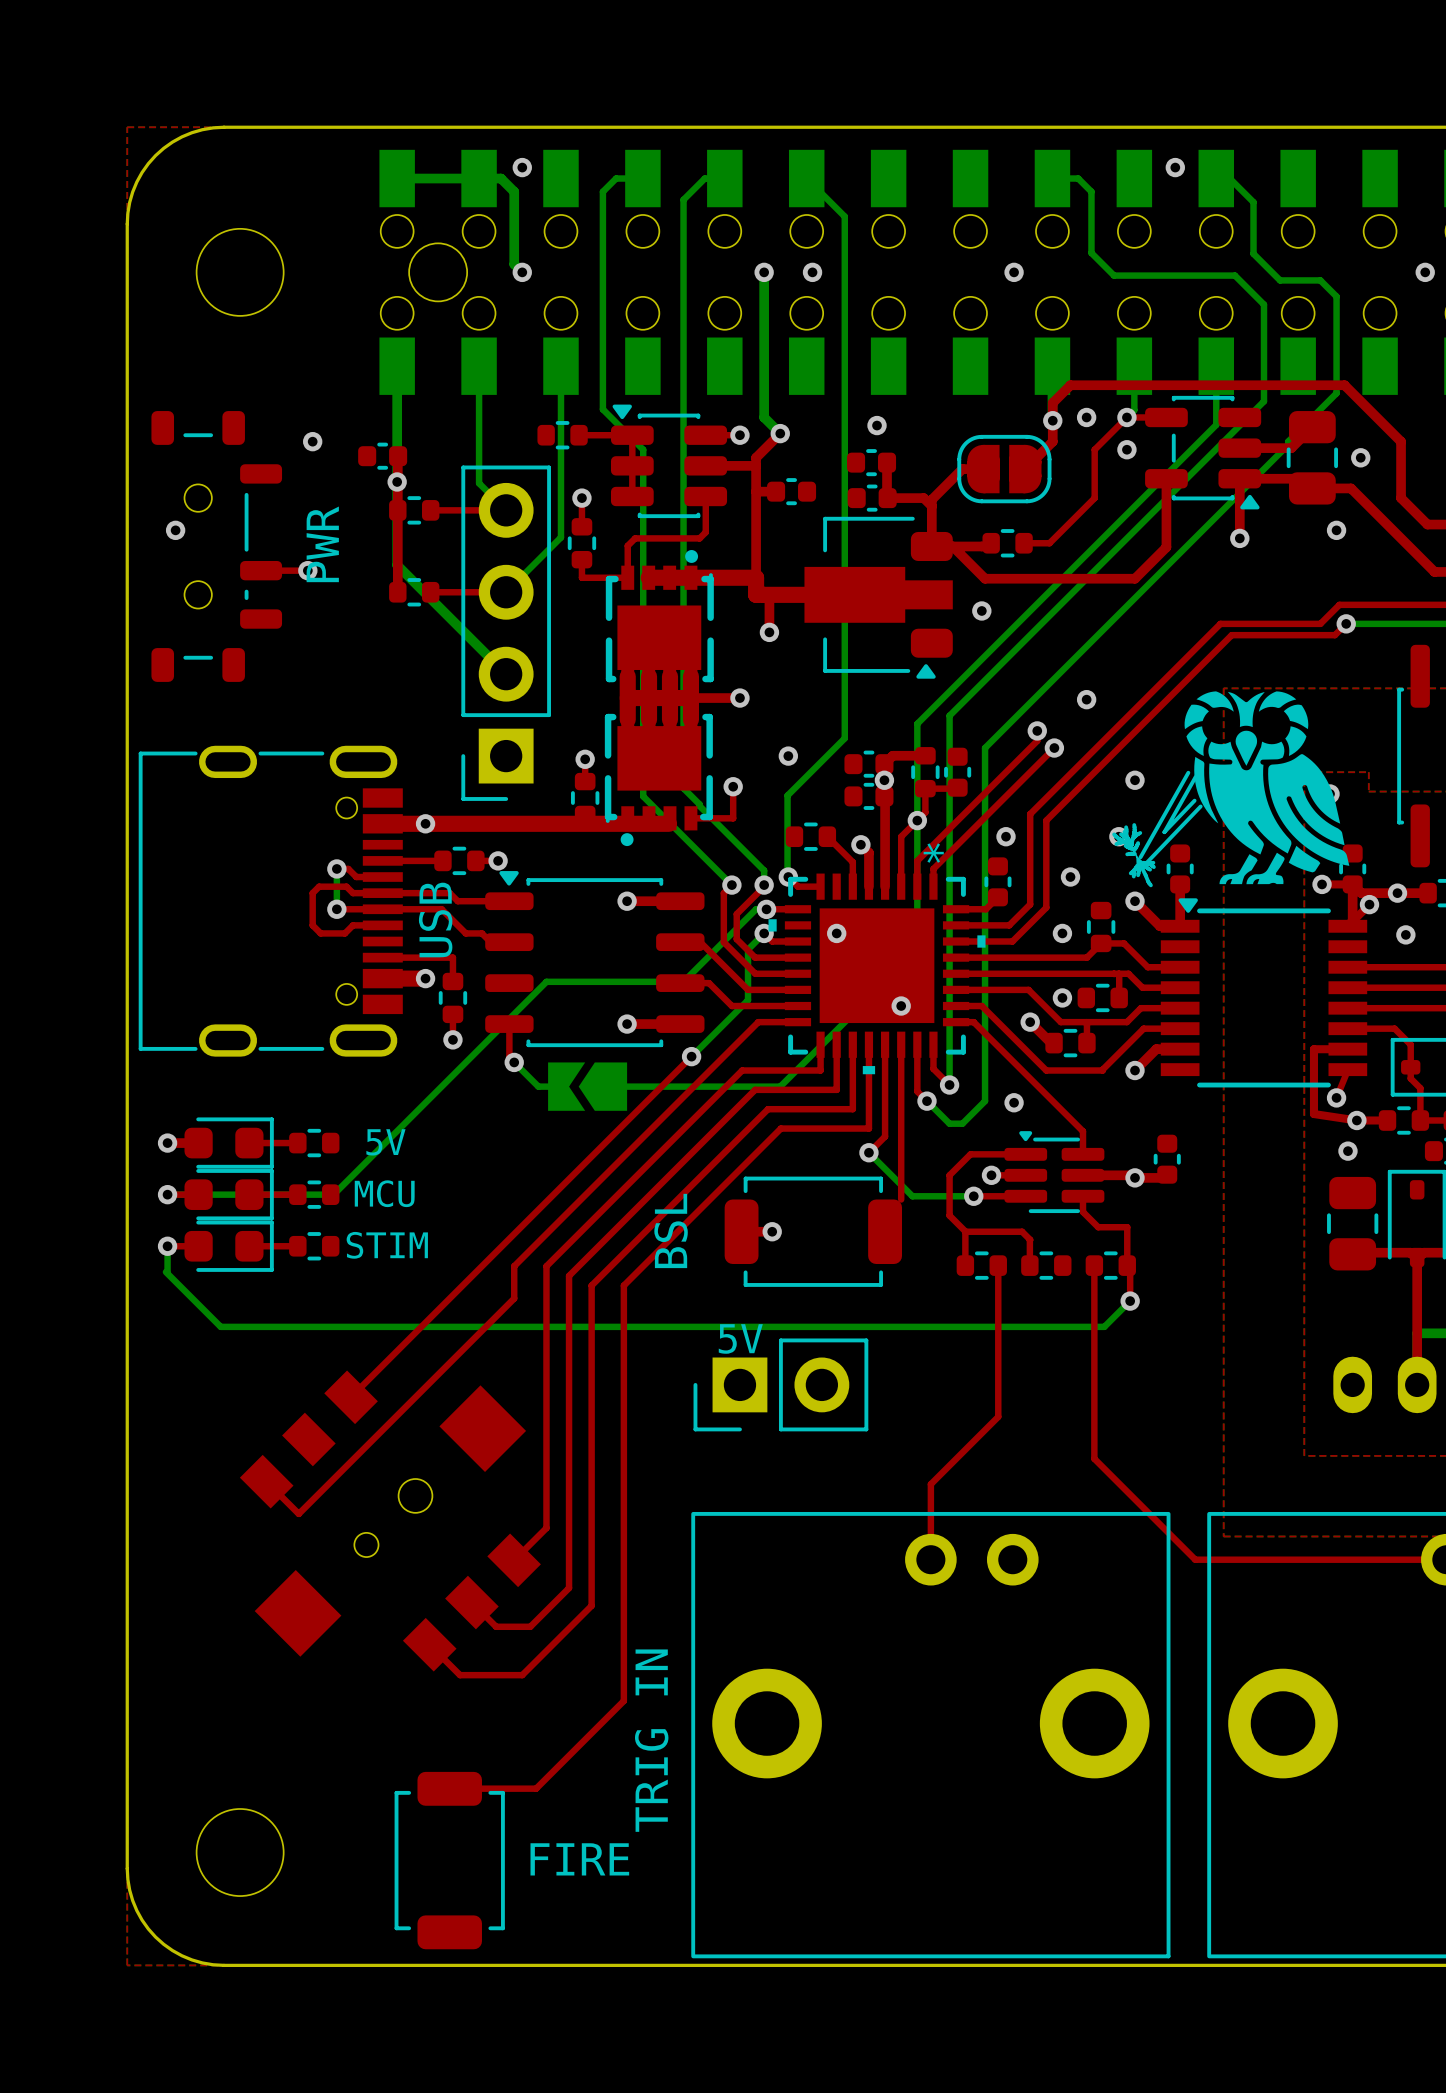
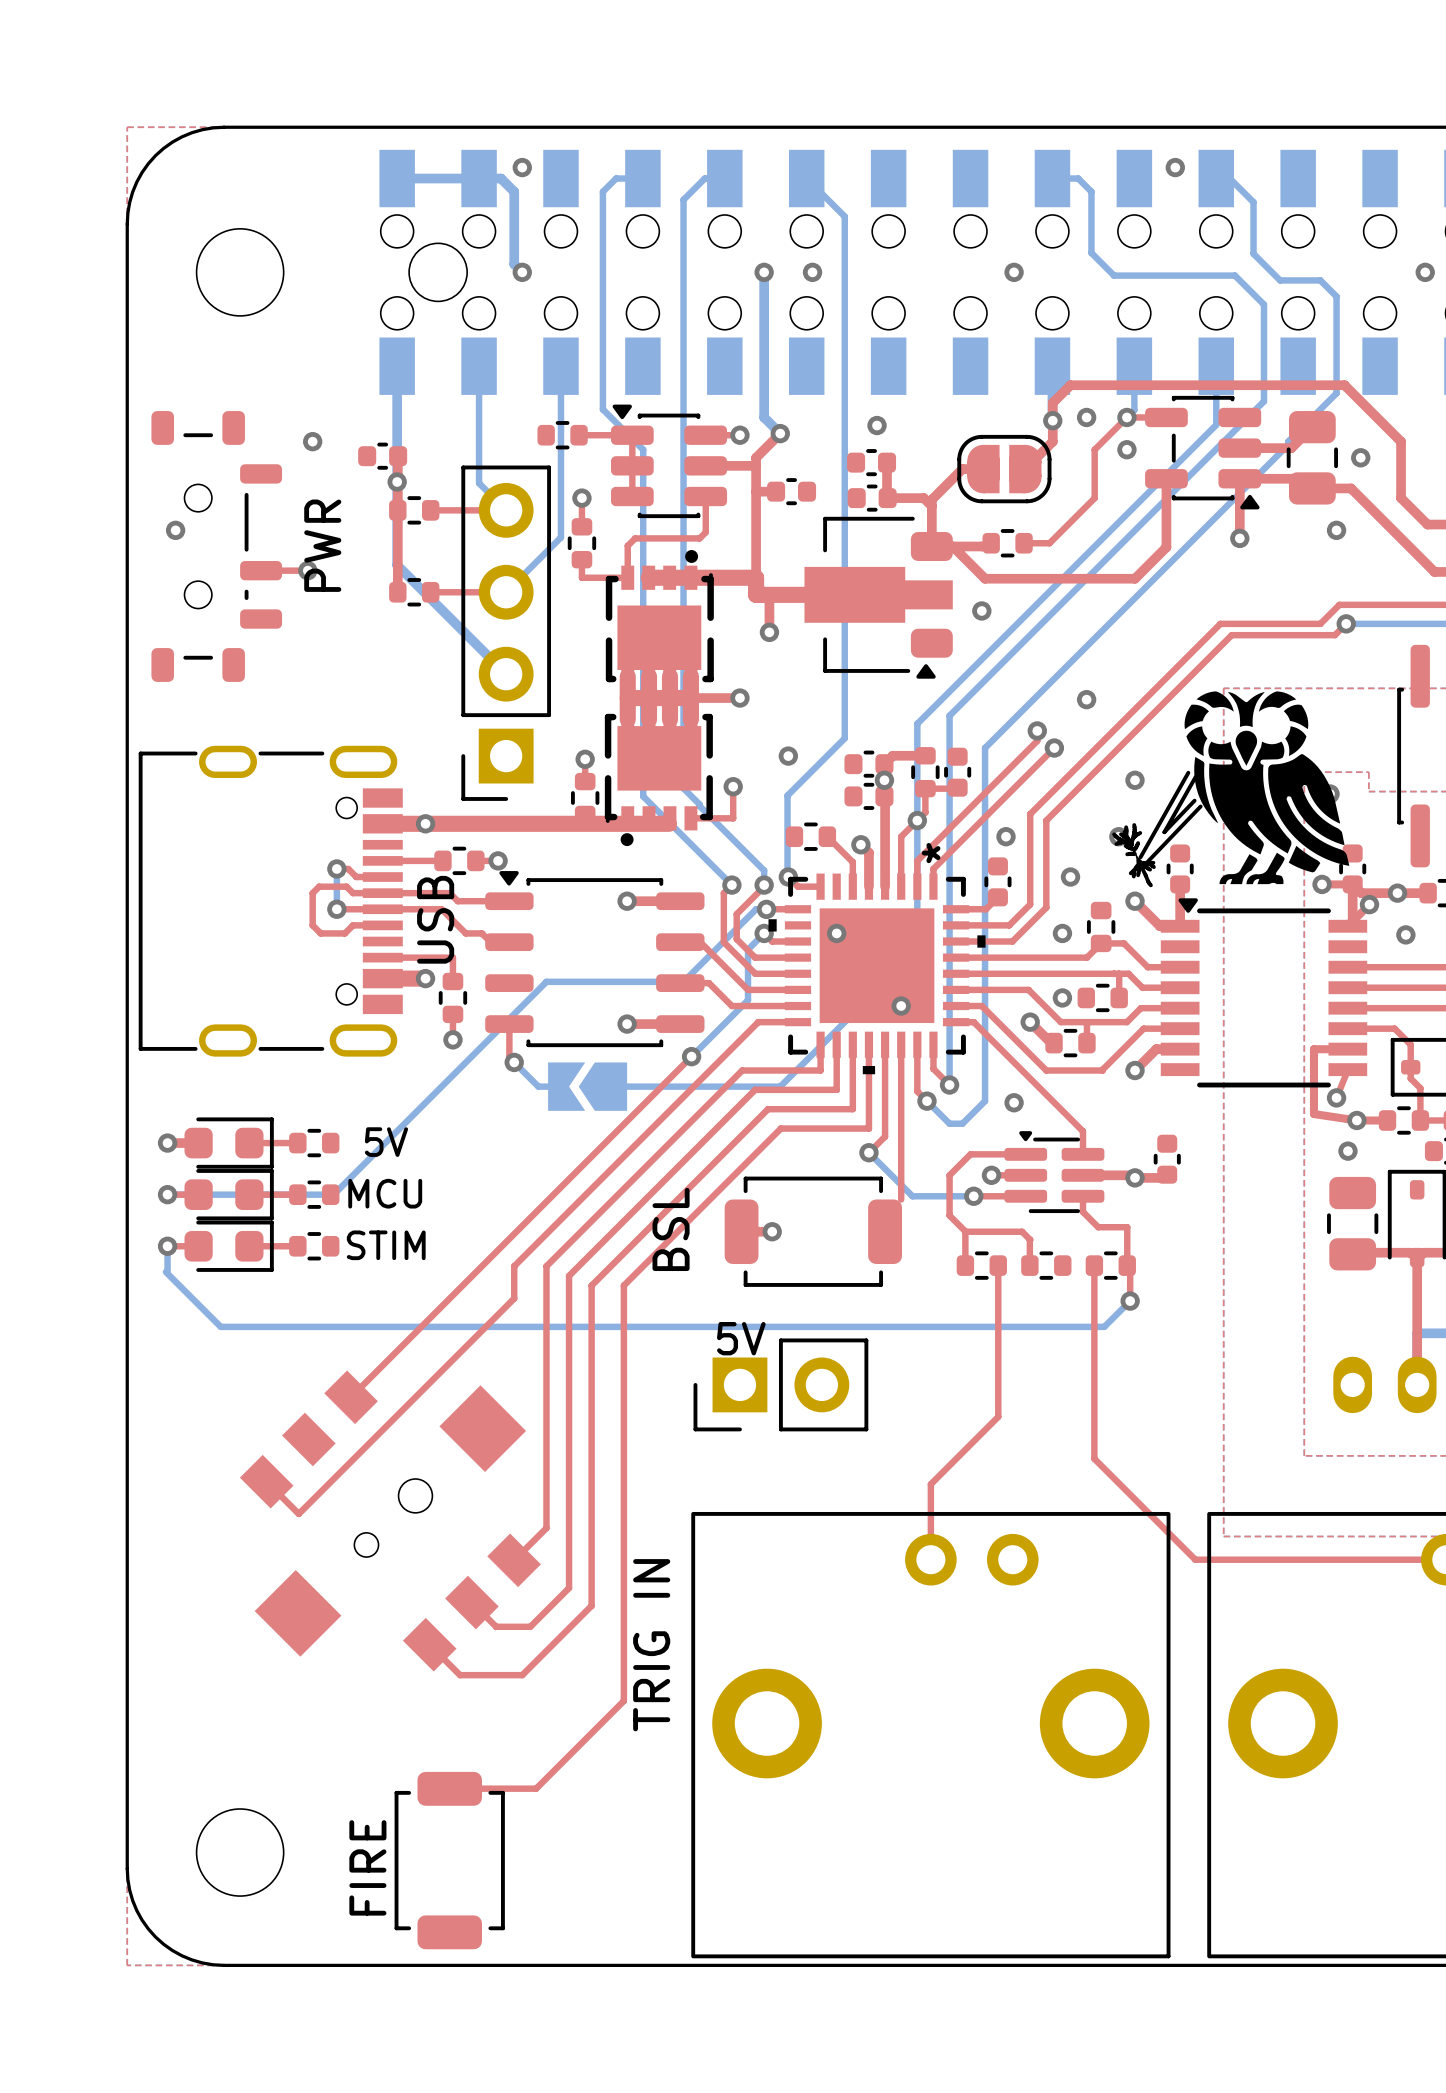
text position: TRIG IN (651, 1740) -> TRIG IN (651, 1645)
text rotation: 0° (579, 1859) -> 90° counterclockwise (367, 1867)
text position: FIRE (579, 1859) -> FIRE (367, 1867)

